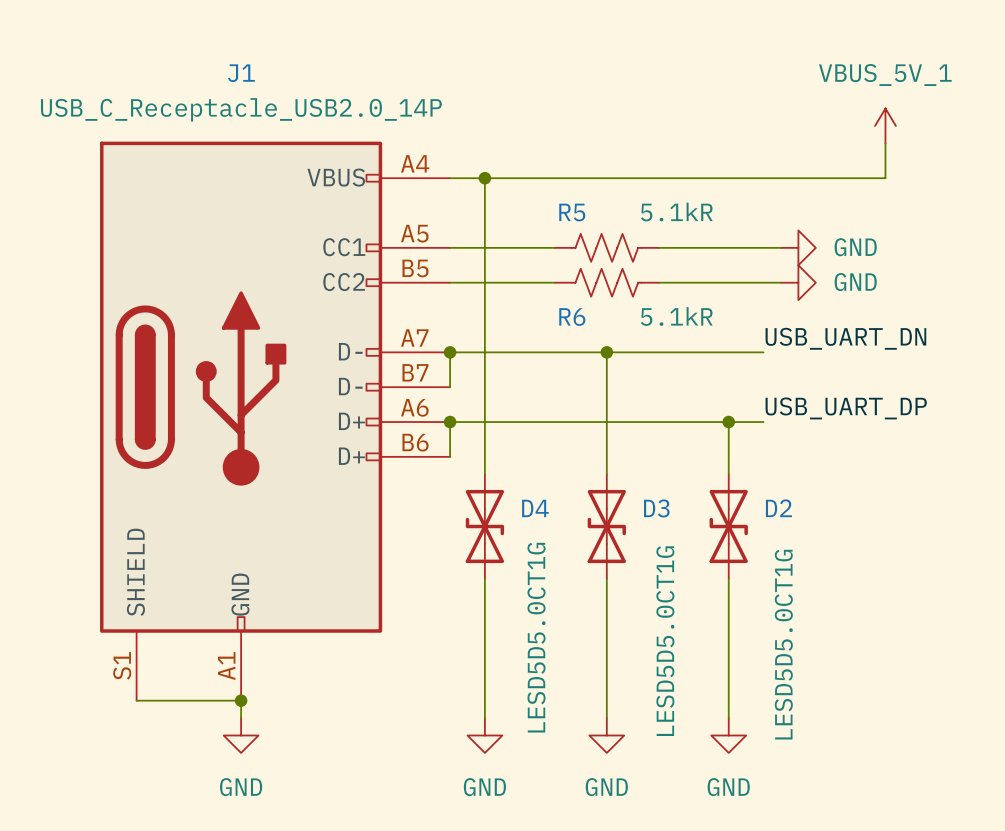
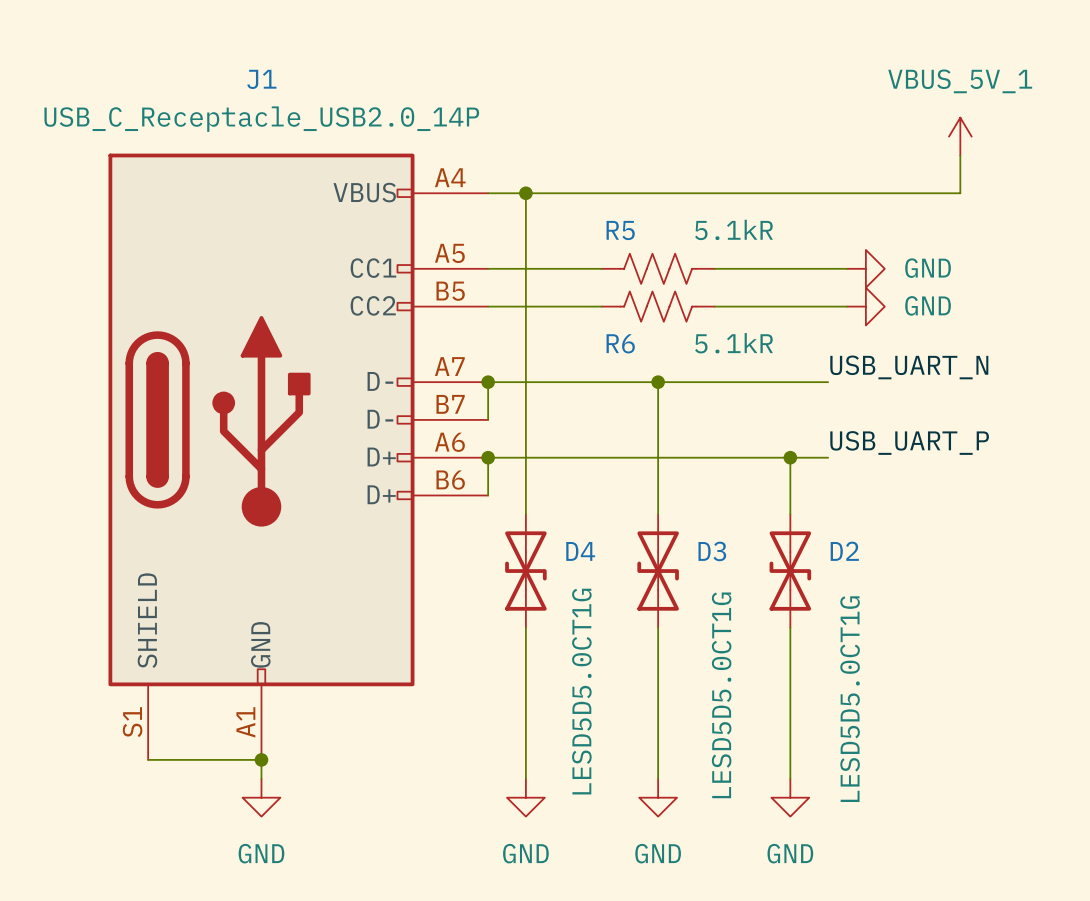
label: USB_UART_DN (845, 338) -> USB_UART_N (909, 367)
label: USB_UART_DP (846, 408) -> USB_UART_P (909, 442)

